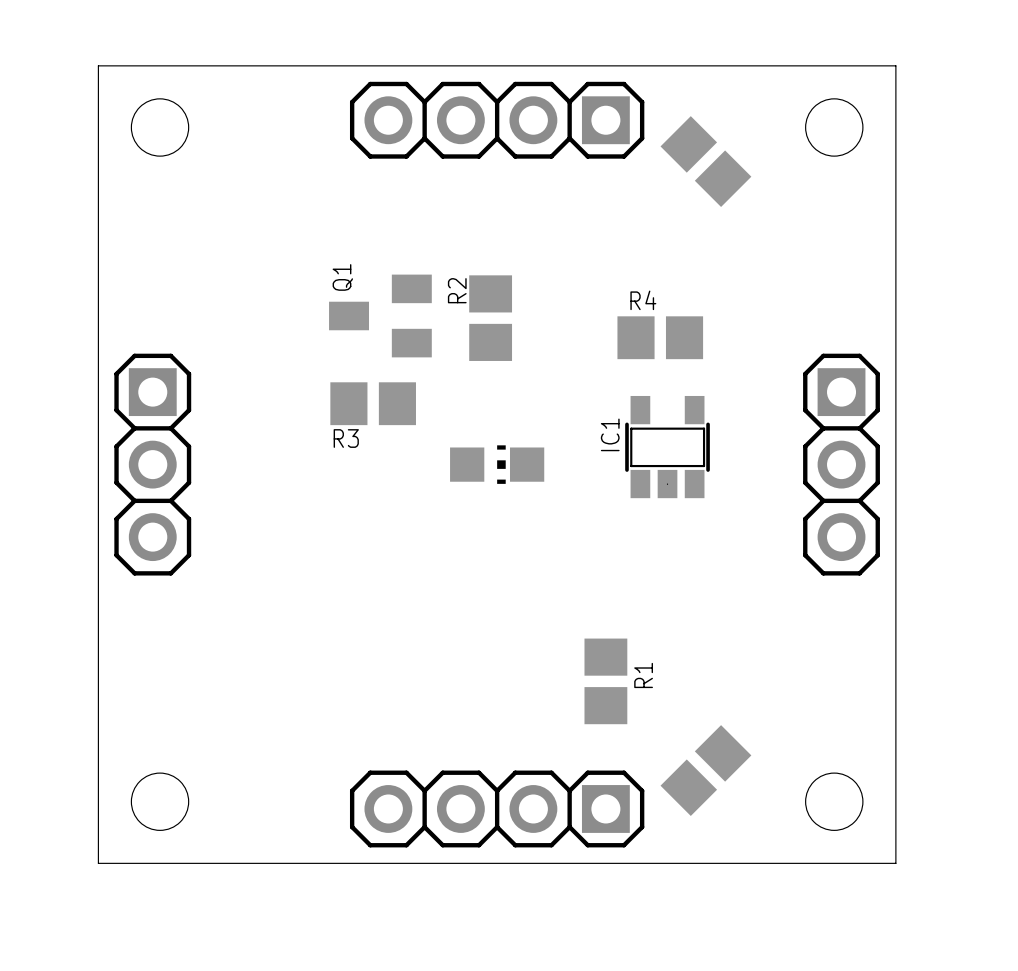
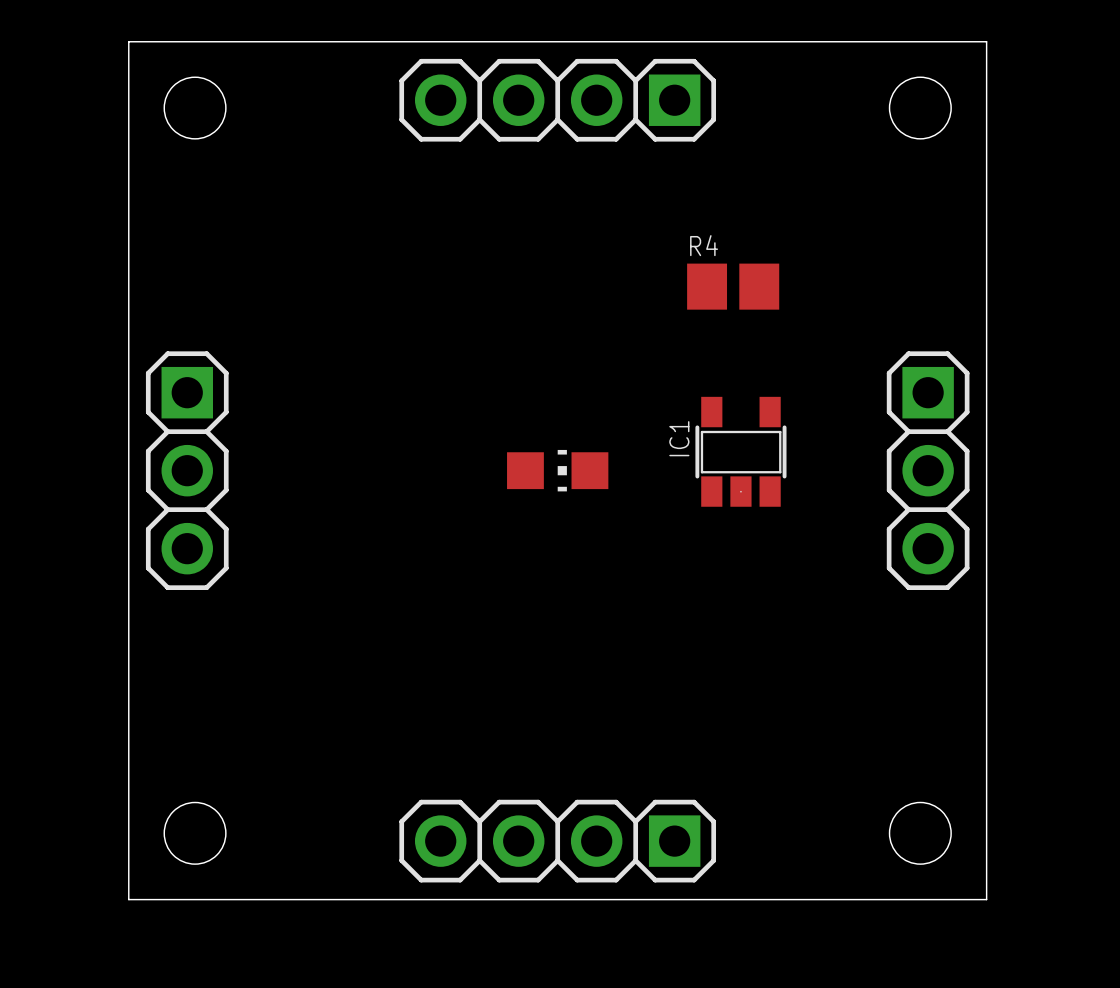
part: (705, 161) -> none
R4 name position: R4 (643, 300) -> R4 (704, 245)
Q1: (380, 315) -> none
R2: (490, 318) -> none
R4 position: (660, 337) -> (733, 286)
R3: (373, 403) -> none
R1: (605, 681) -> none
part: (705, 770) -> none

